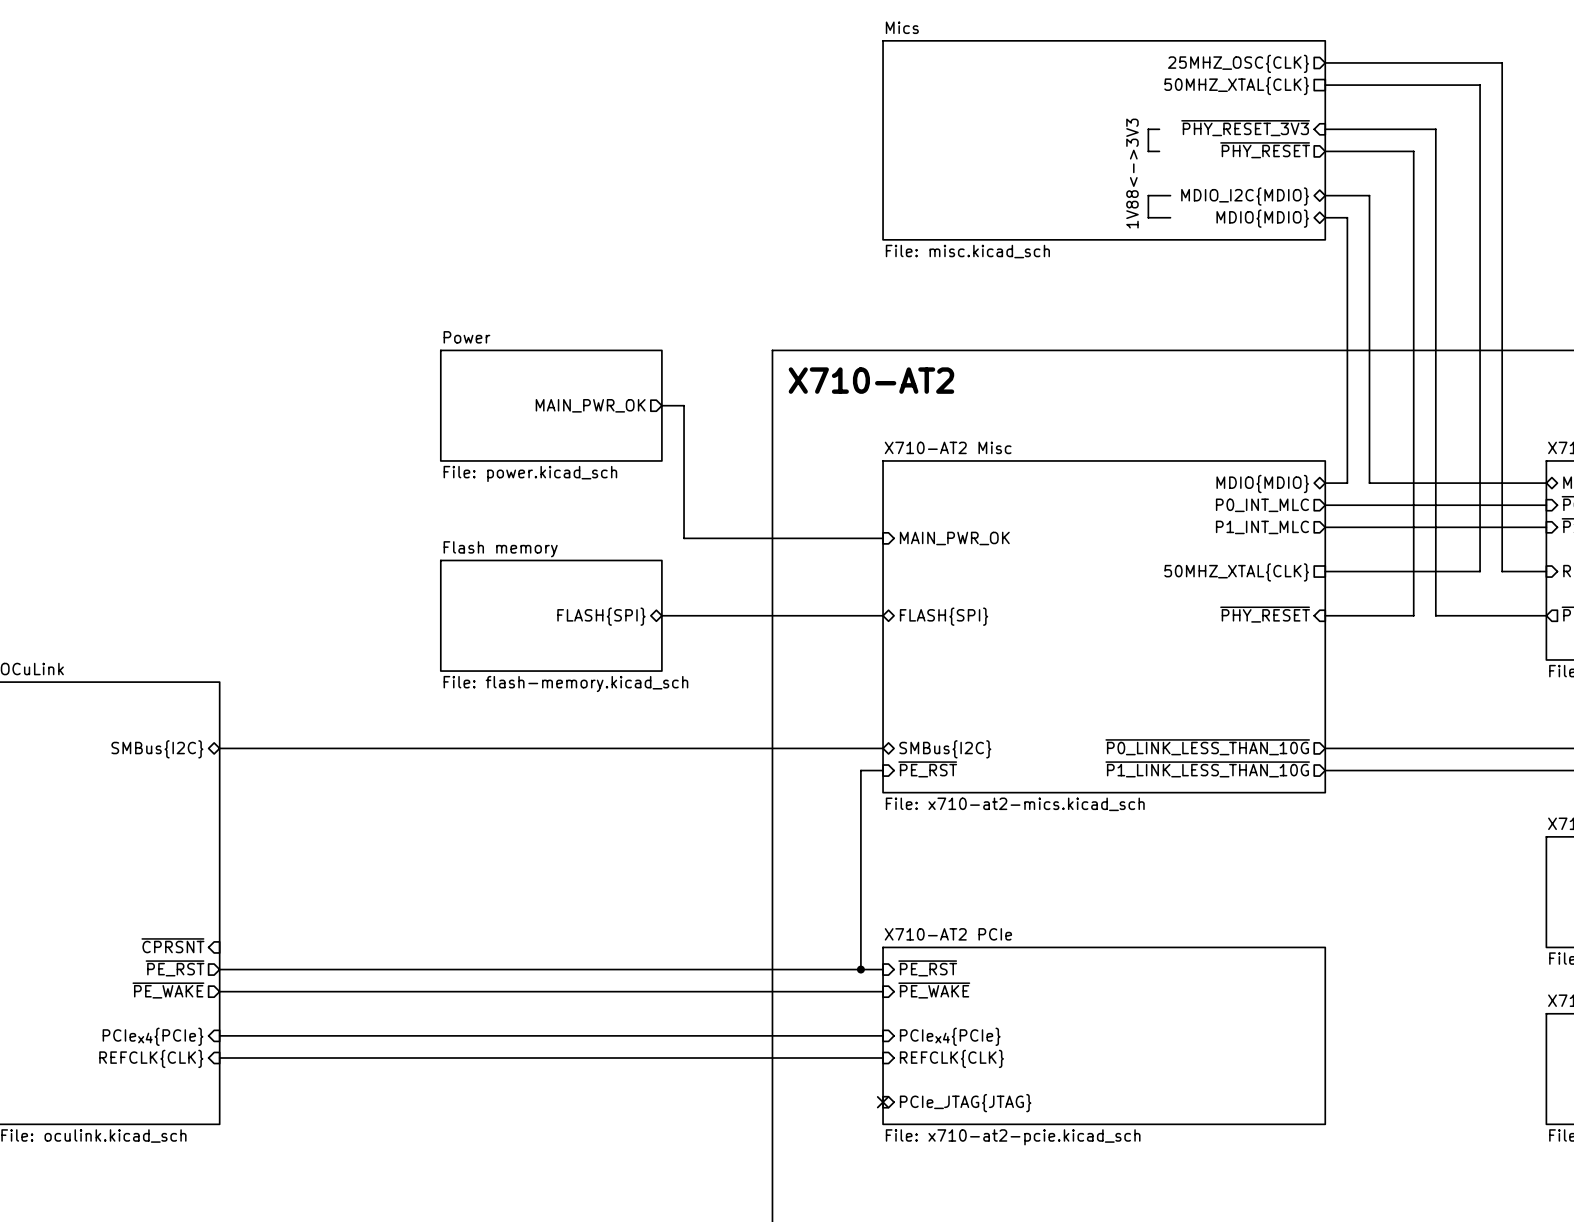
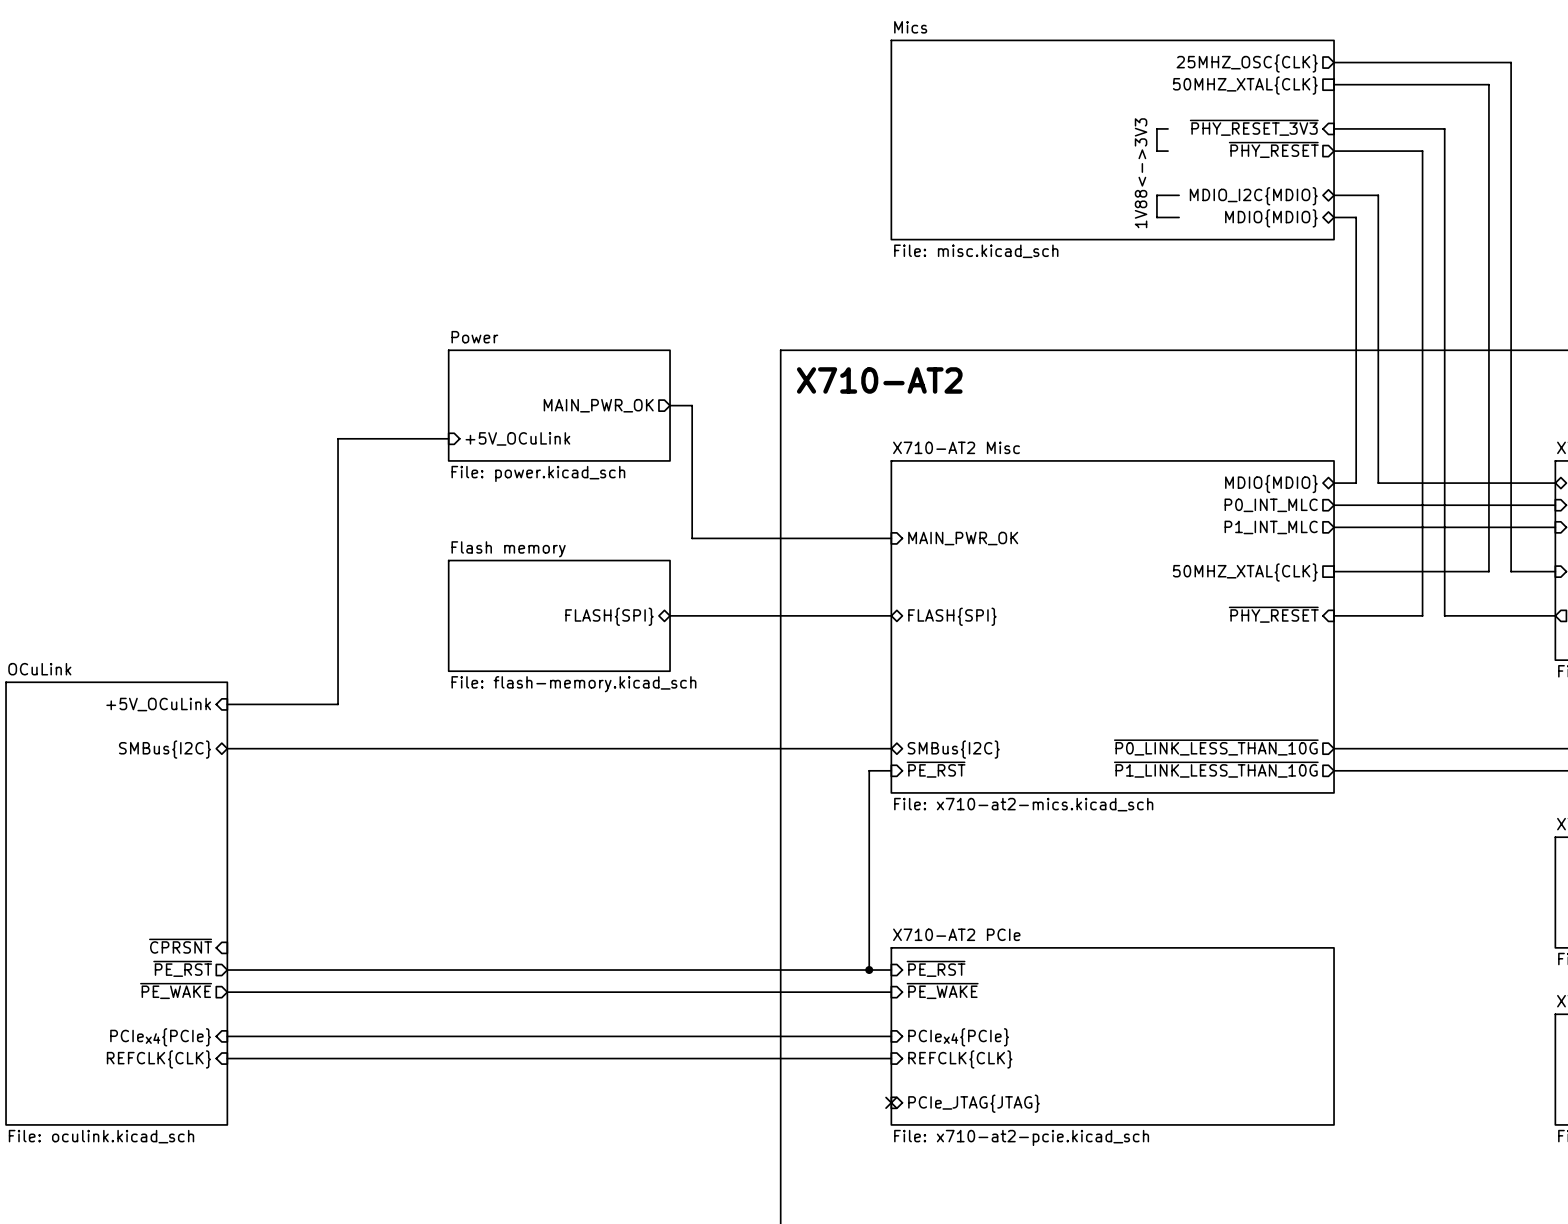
wire: none -> (448, 438) (338, 438) (338, 704) (227, 704)
sheet pin: none -> +5V_OCuLink (517, 438)
sheet pin: none -> +5V_OCuLink (158, 704)

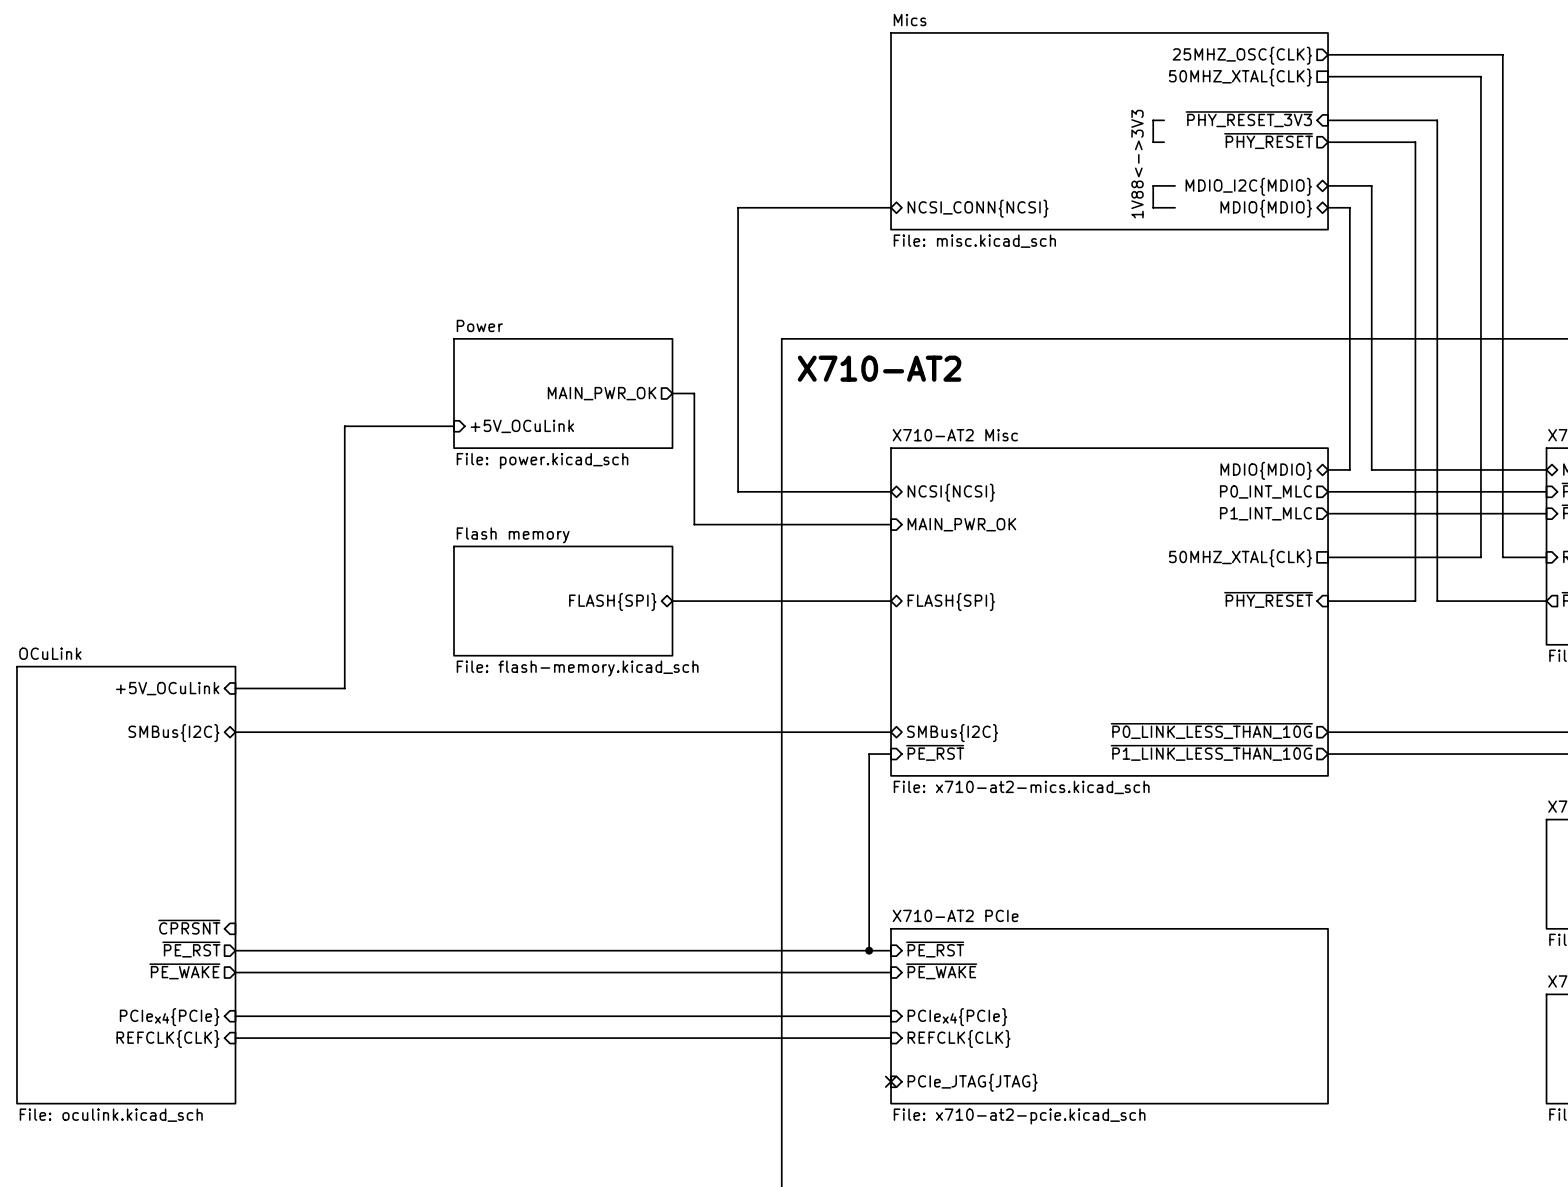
bus: none -> (891, 207) (738, 207) (738, 491) (891, 491)
sheet pin: none -> NCSI_CONN{NCSI} (978, 208)
sheet pin: none -> NCSI{NCSI} (951, 492)

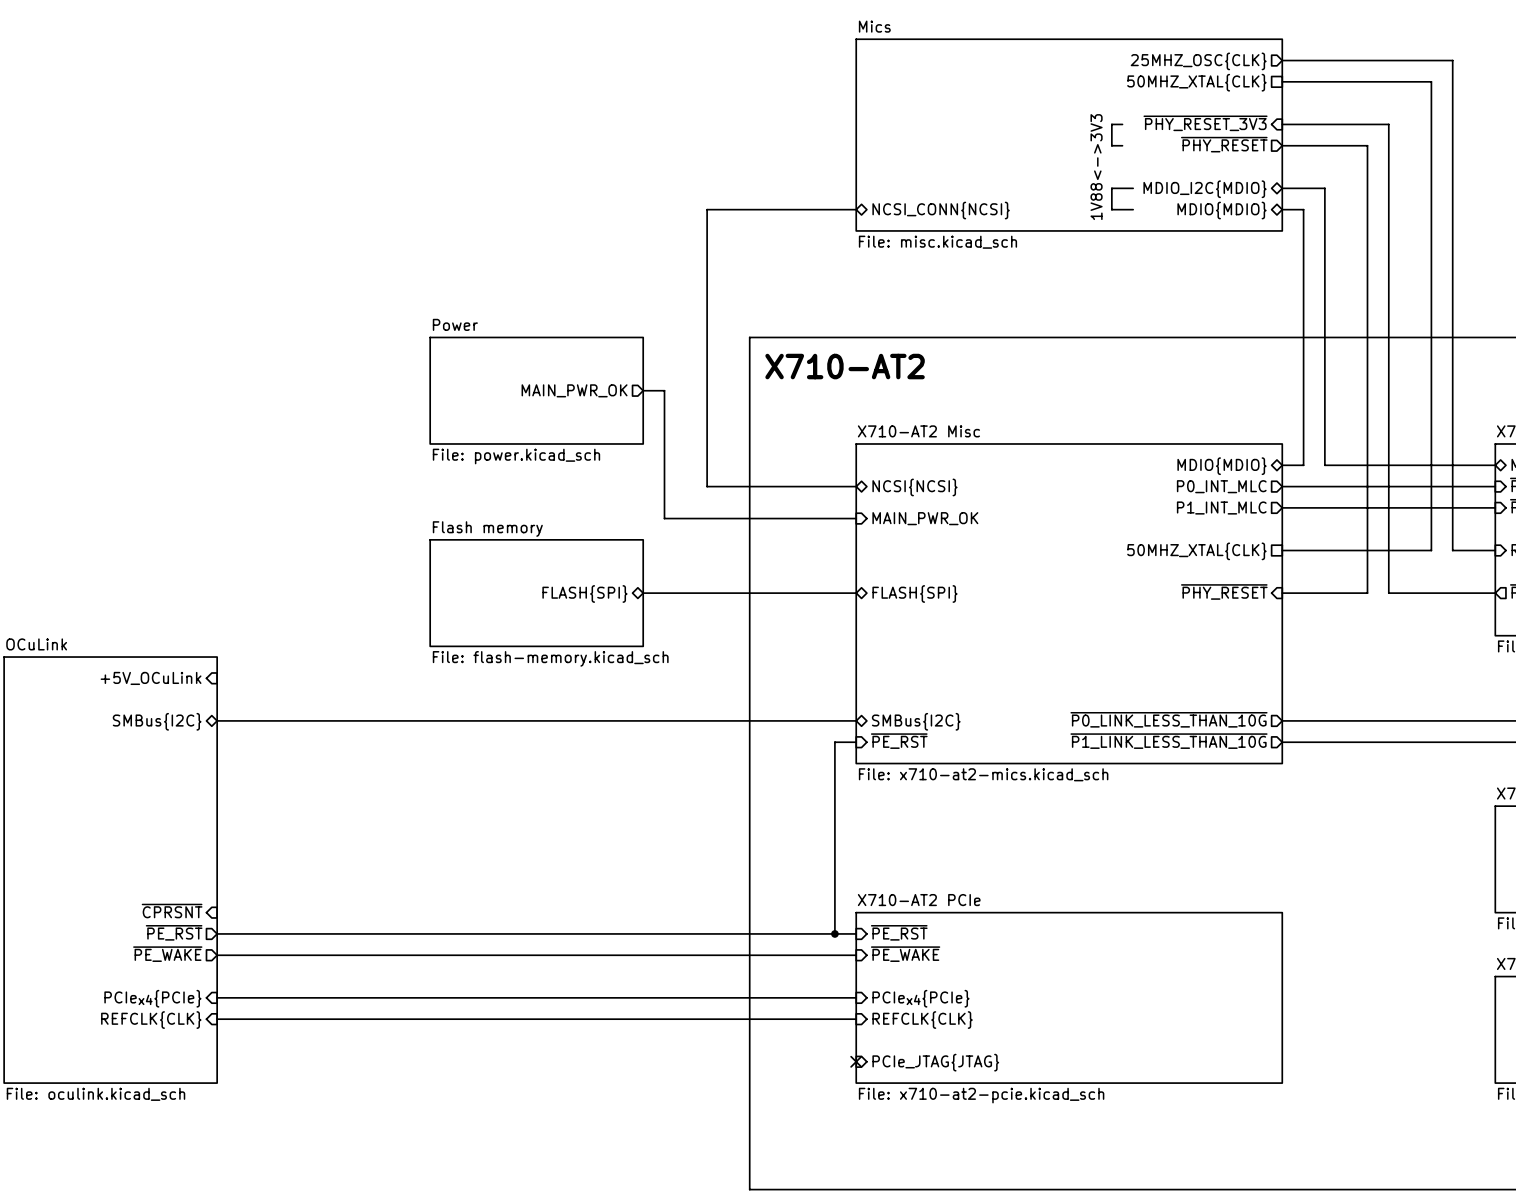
wire: (454, 426) (344, 426) (344, 688) (235, 688) -> none
sheet pin: +5V_OCuLink (522, 426) -> none

